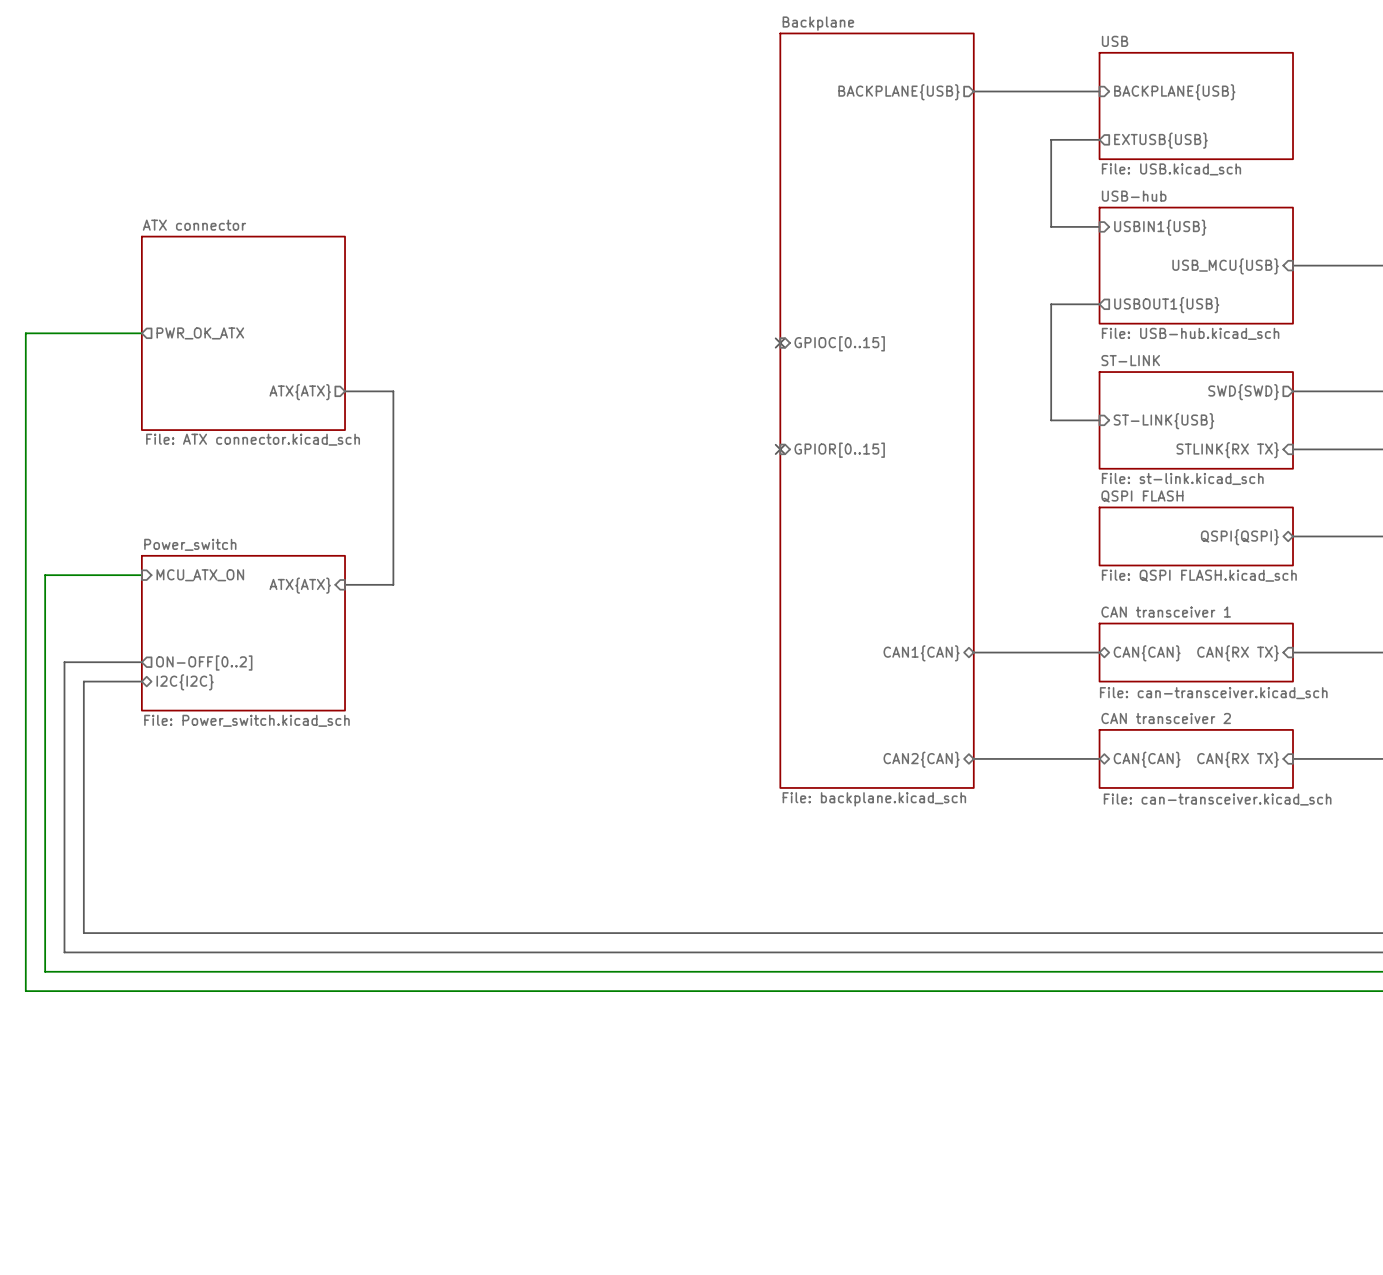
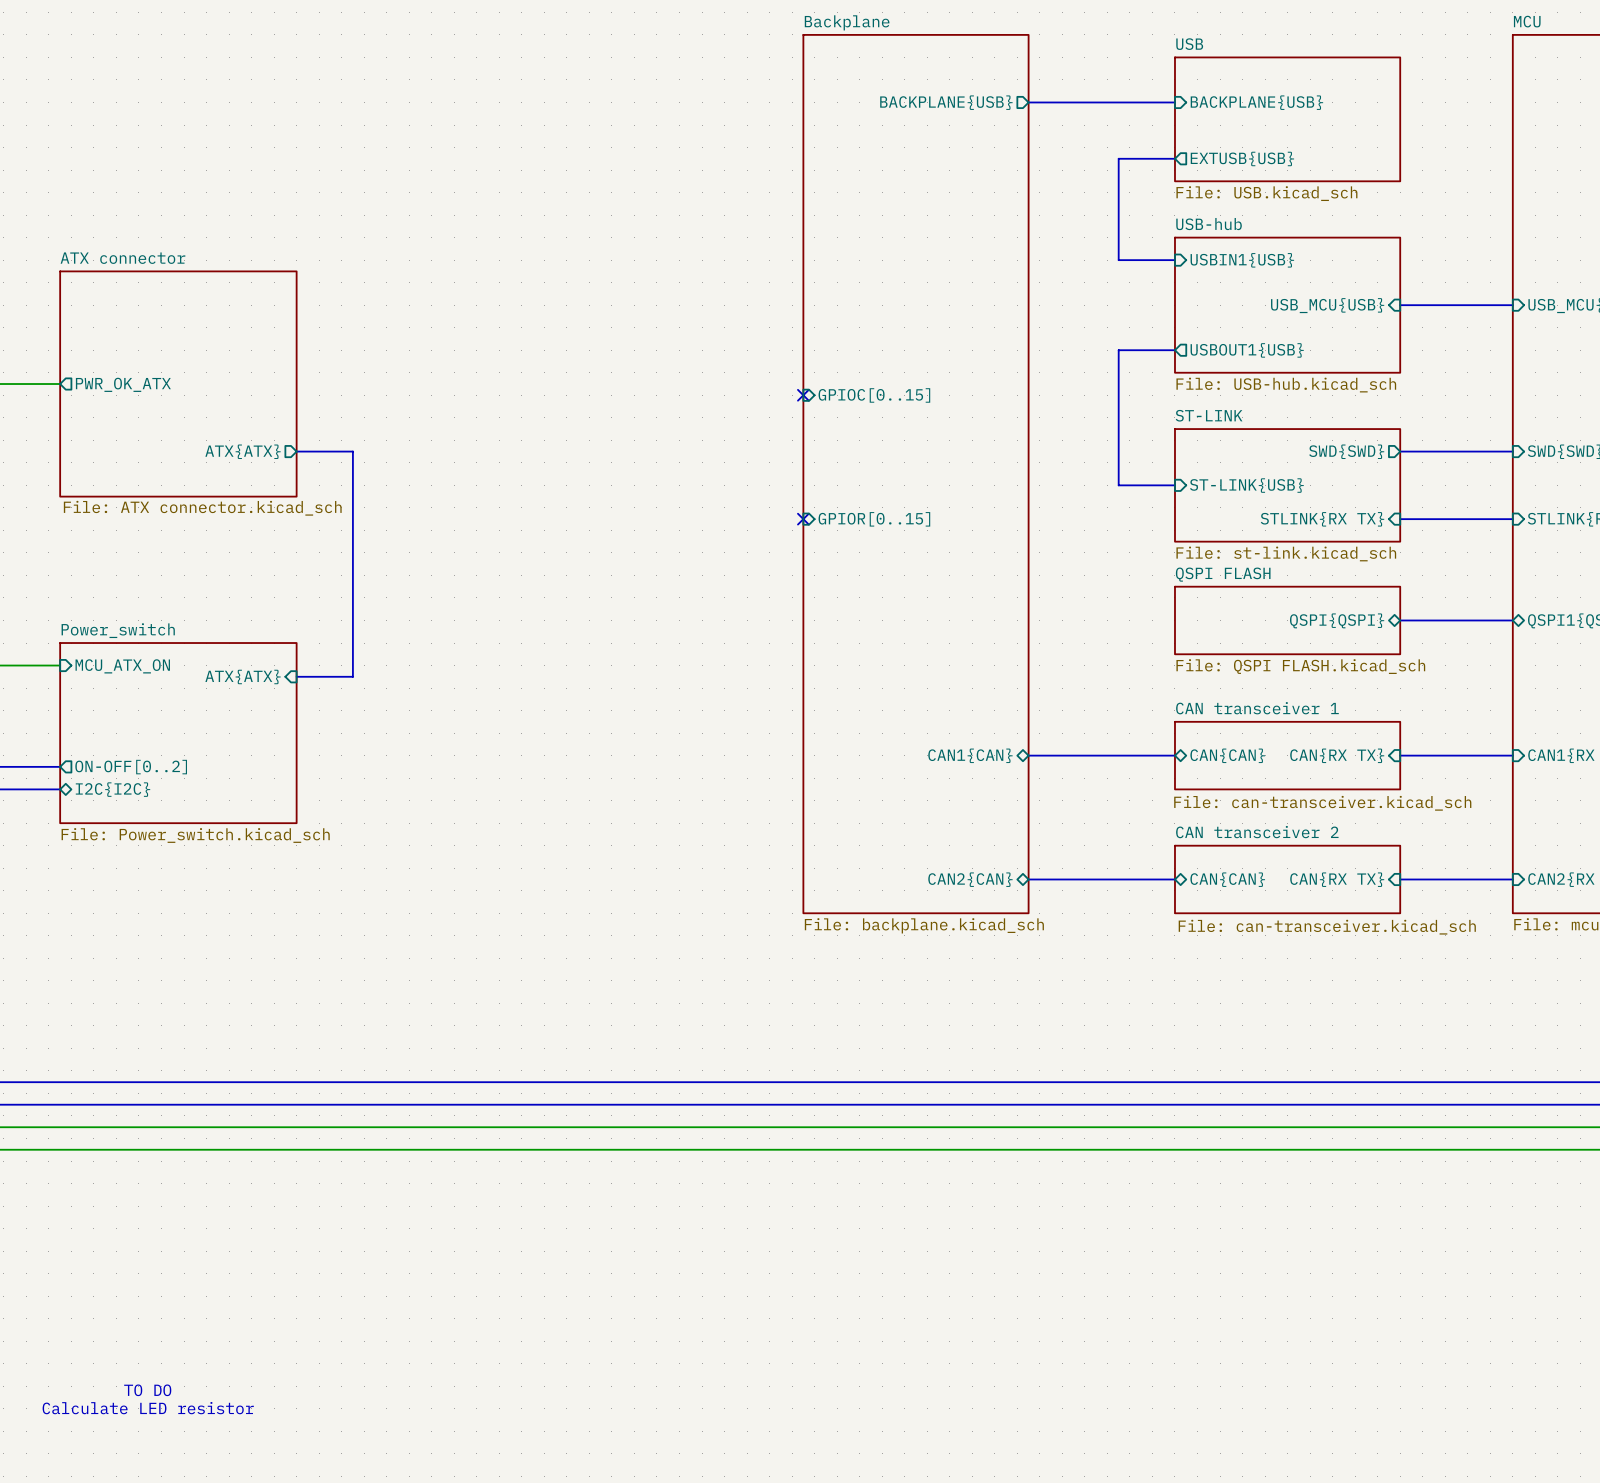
text: none -> TO DO (147, 1390)
text: none -> Calculate LED resistor (148, 1408)

